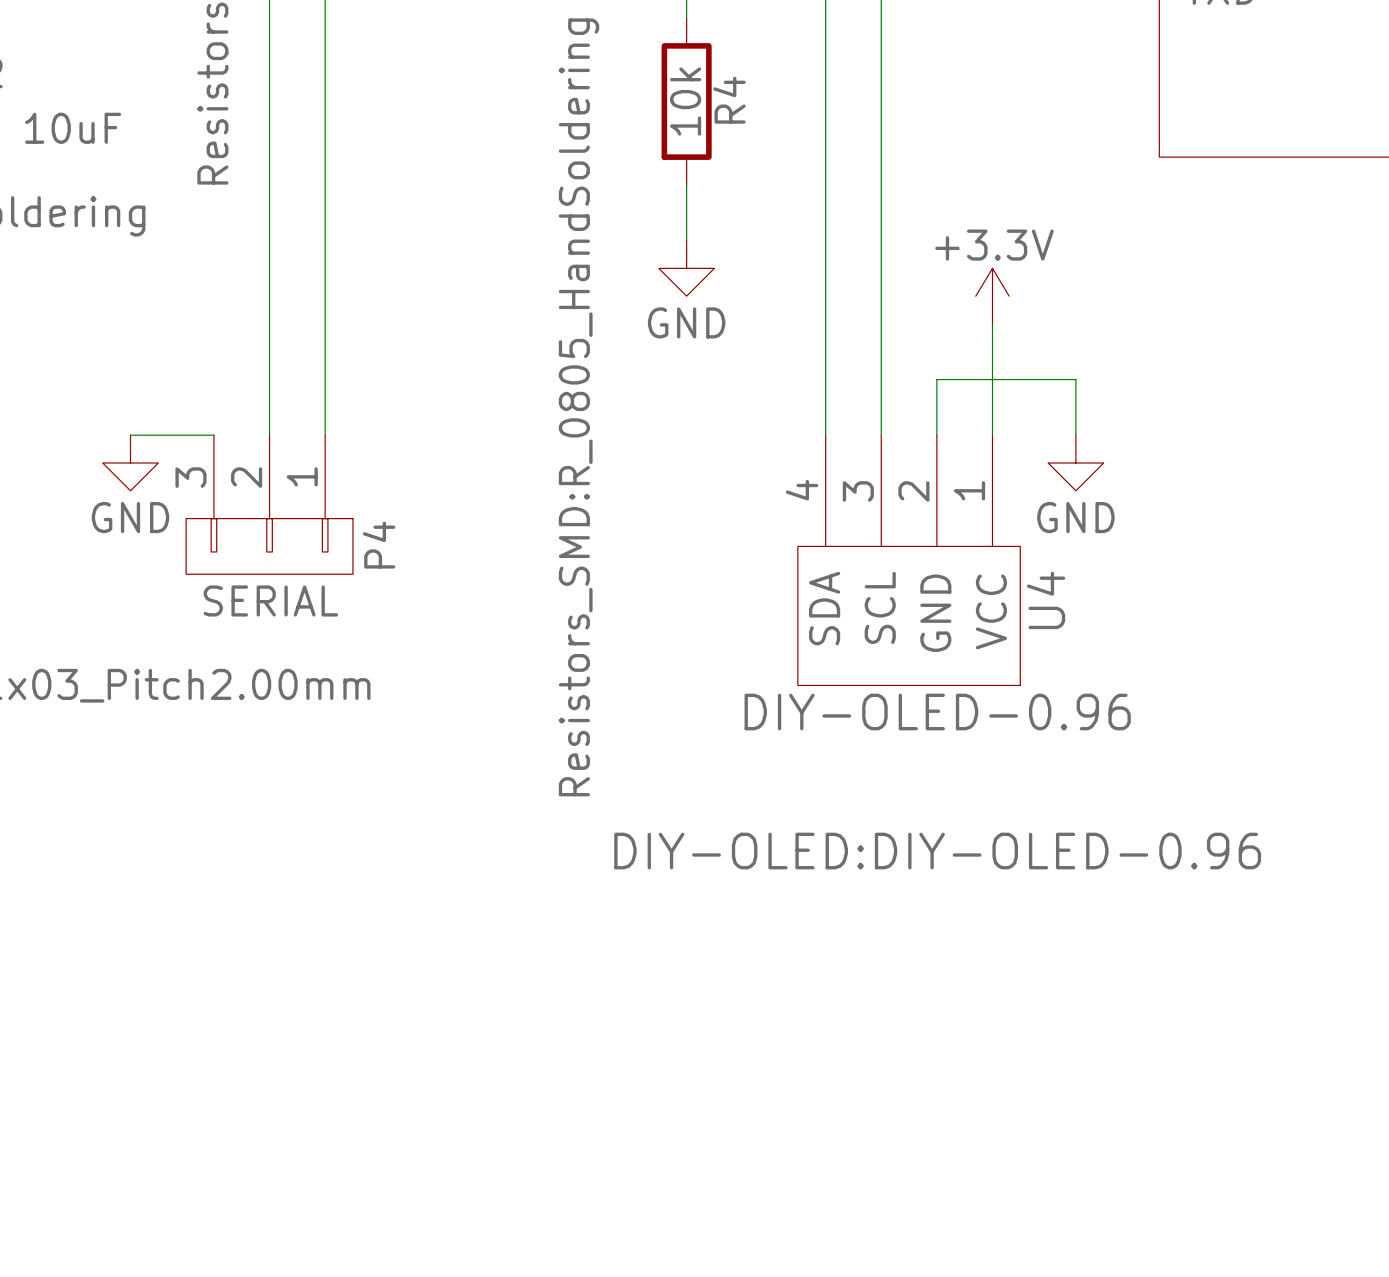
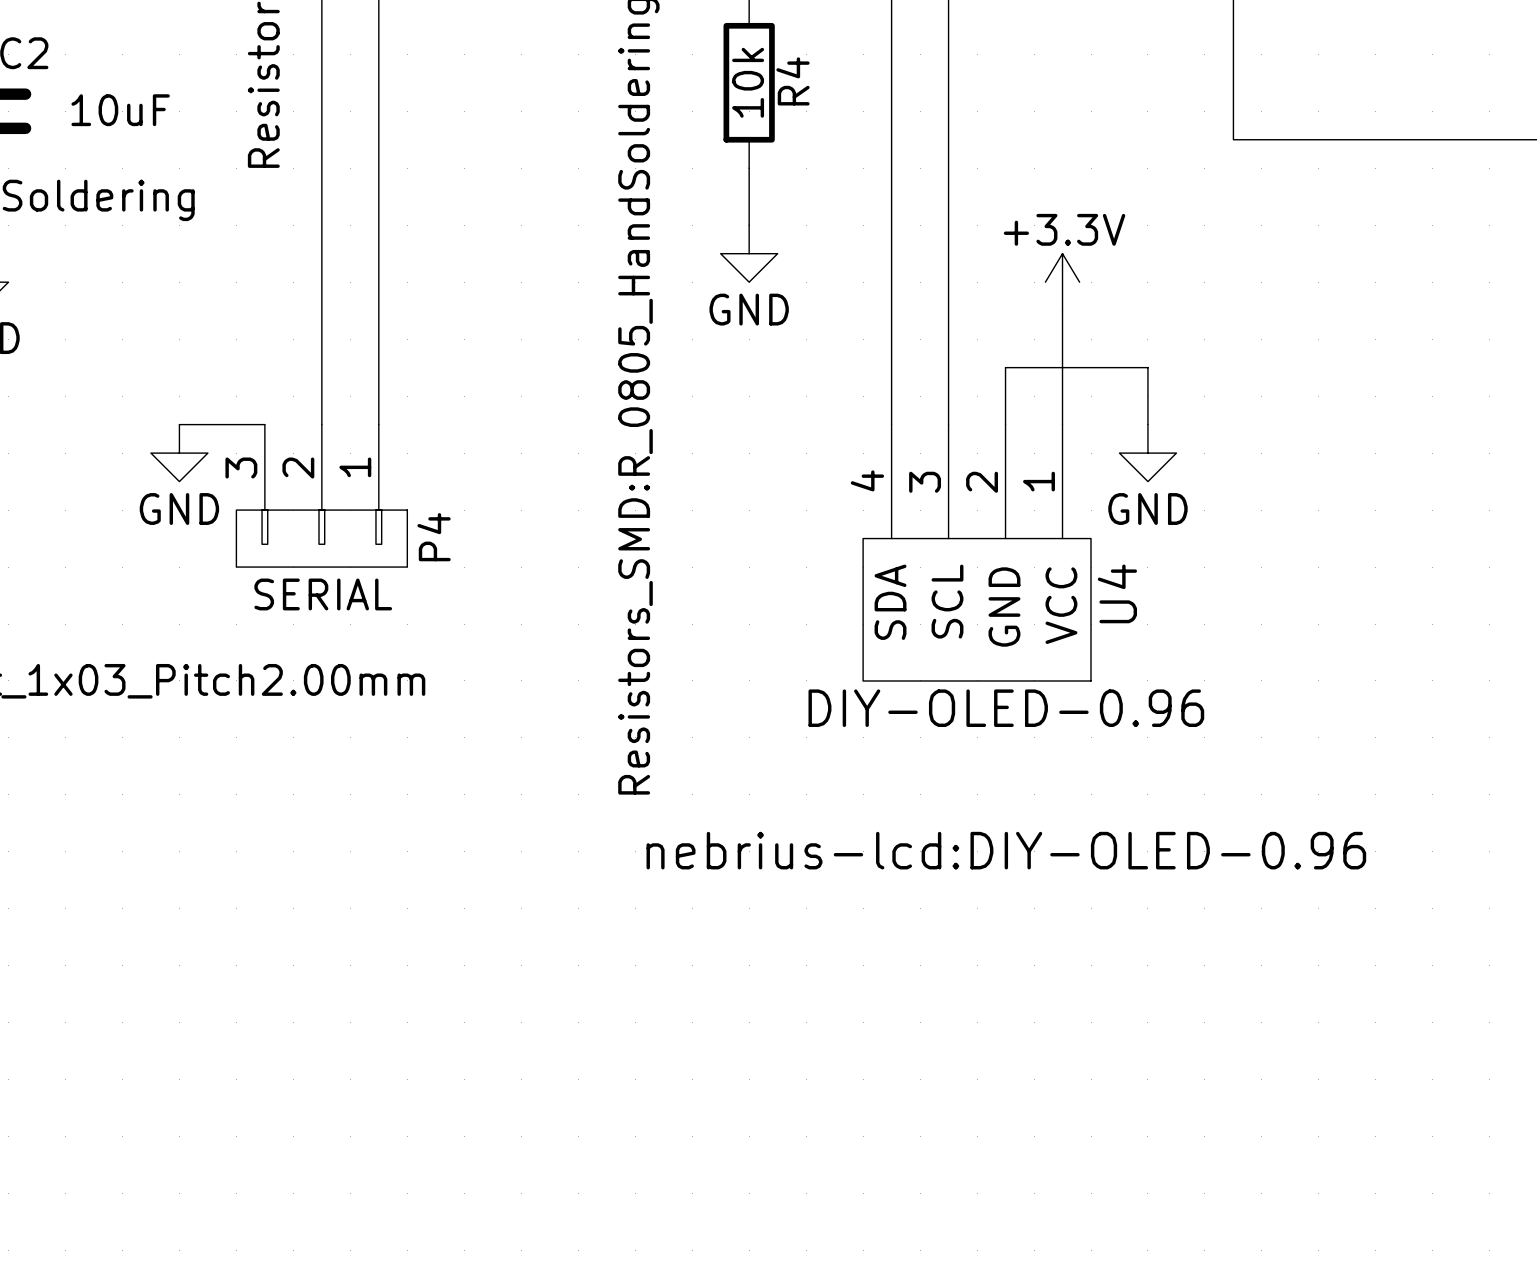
U4 text: DIY-OLED:DIY-OLED-0.96 (937, 851) -> nebrius-lcd:DIY-OLED-0.96 (1006, 850)

